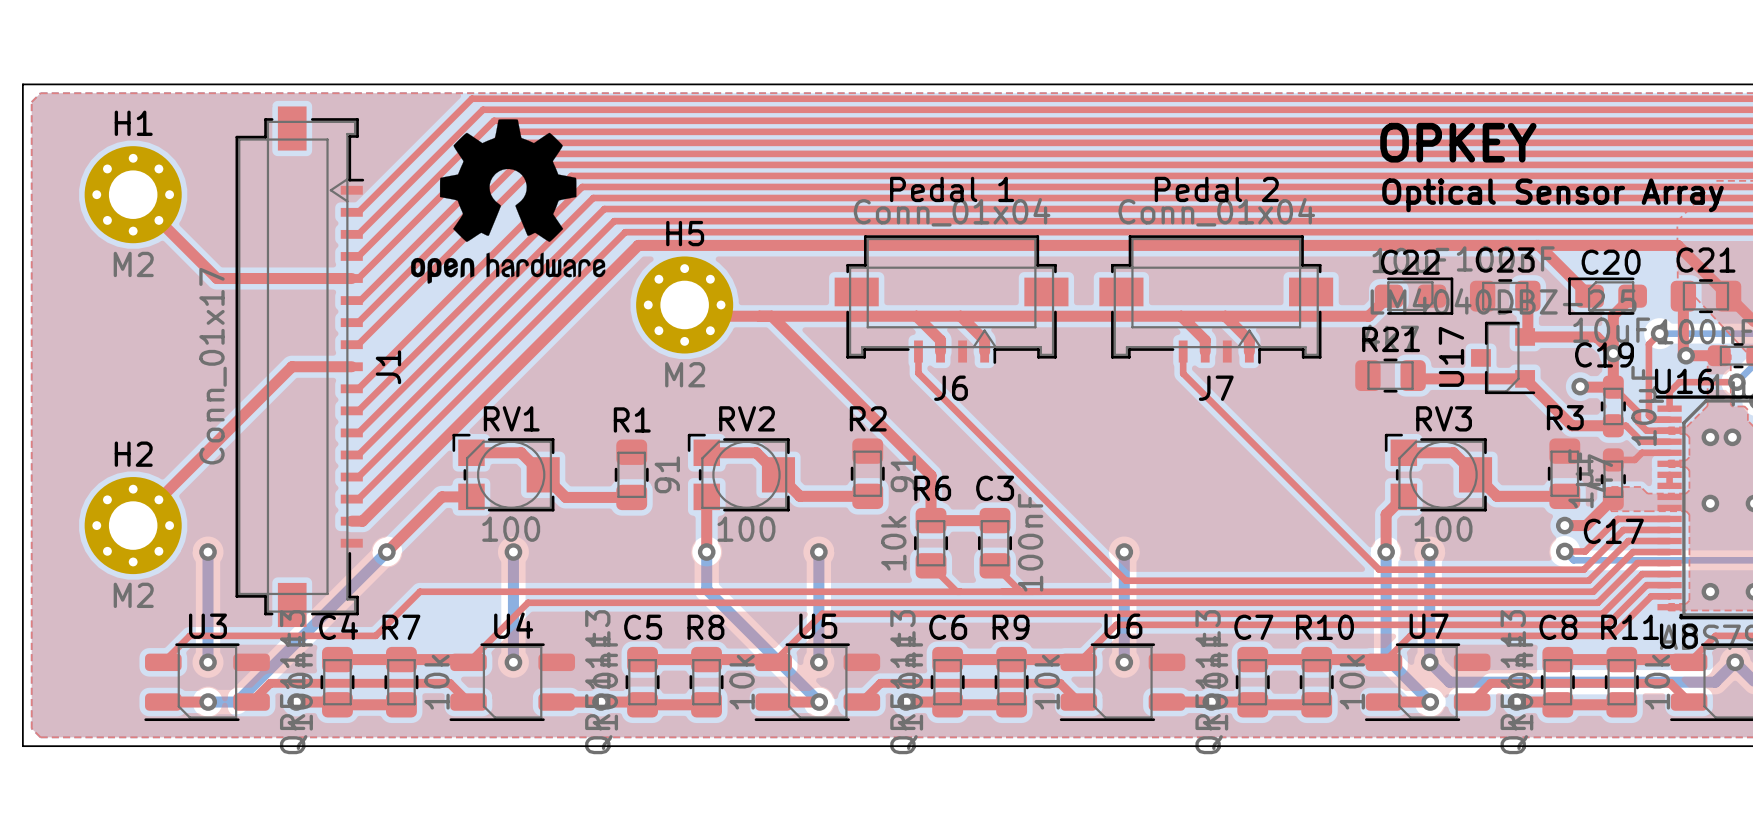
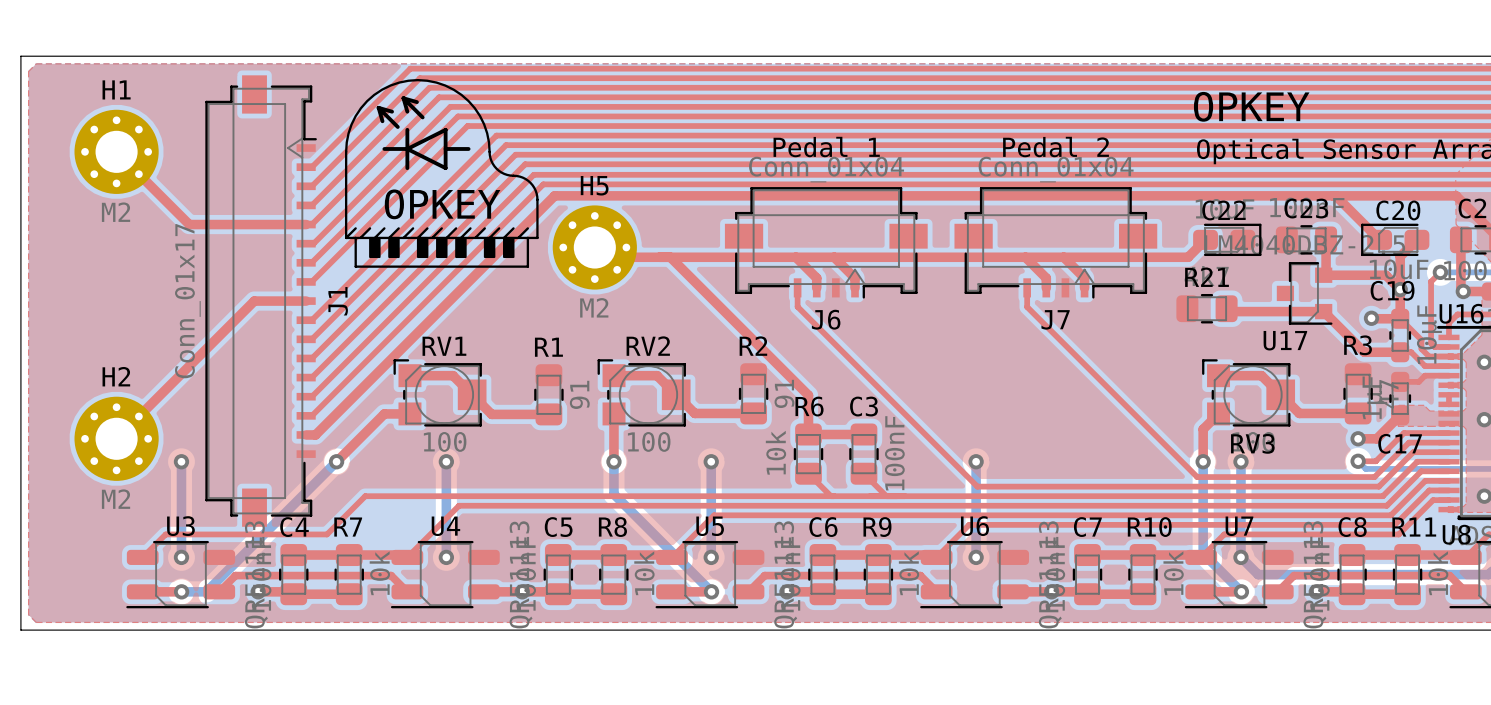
drawing shape: [411, 119, 606, 284] -> [344, 78, 539, 268]
U17 name rotation: 0° (1451, 356) -> 90° clockwise (1285, 340)
RV3 name position: RV3 (1444, 418) -> RV3 (1252, 443)

